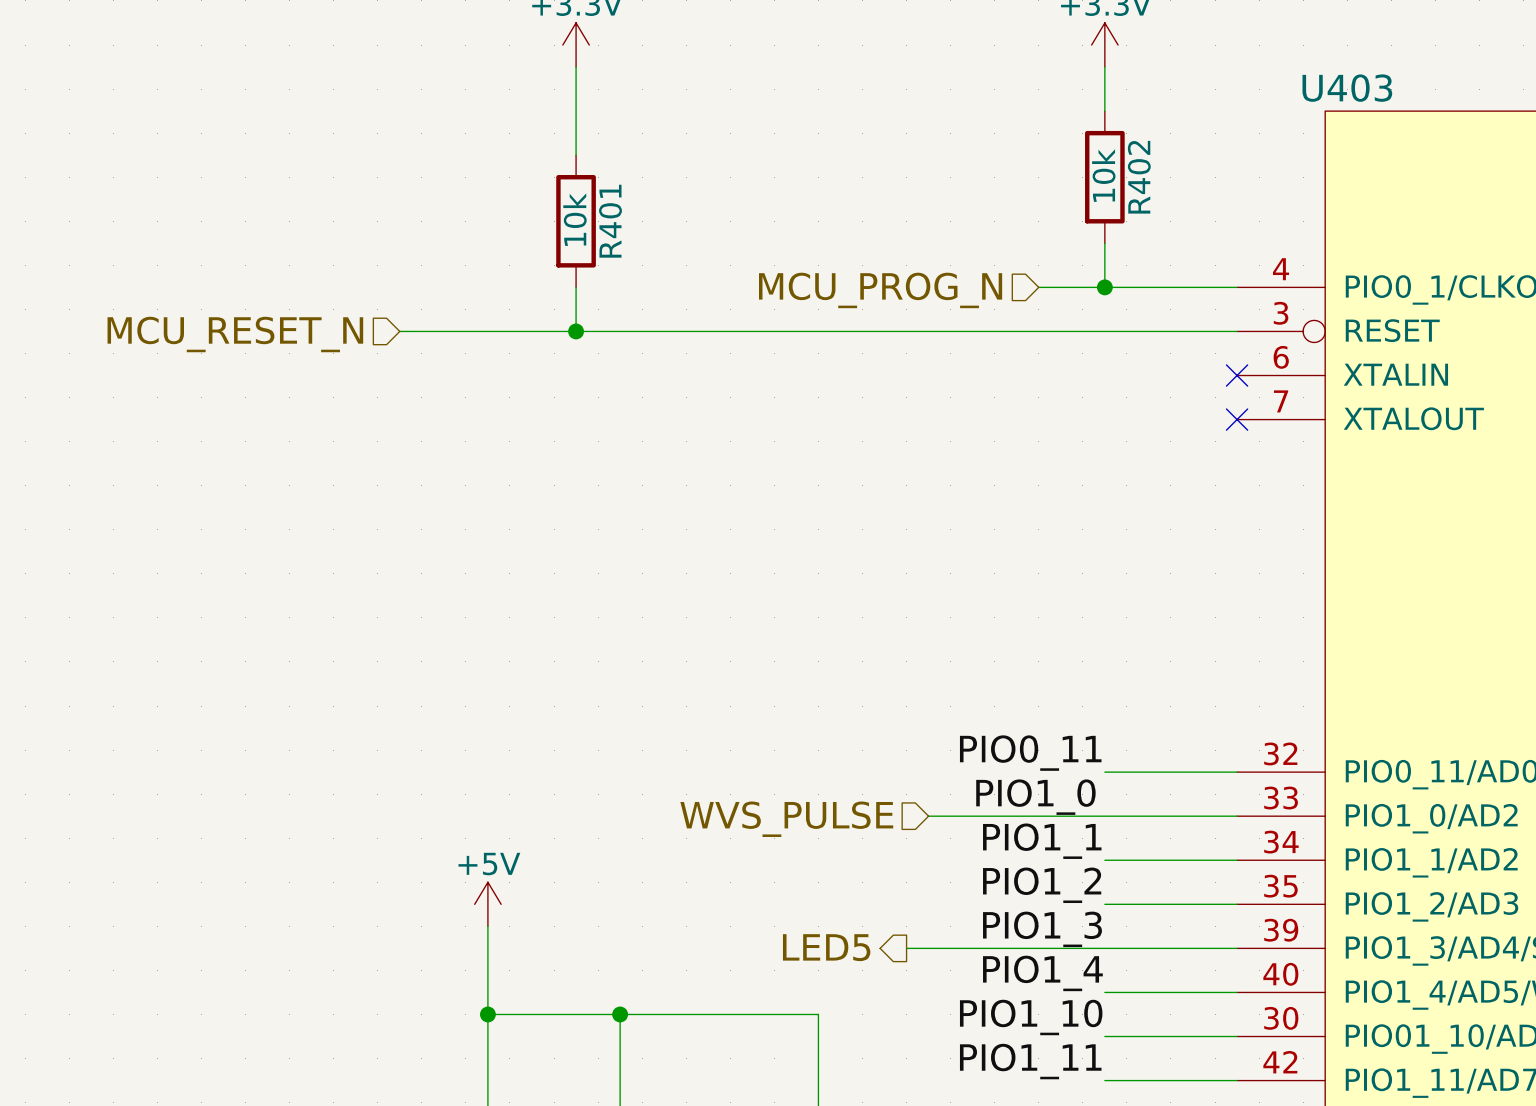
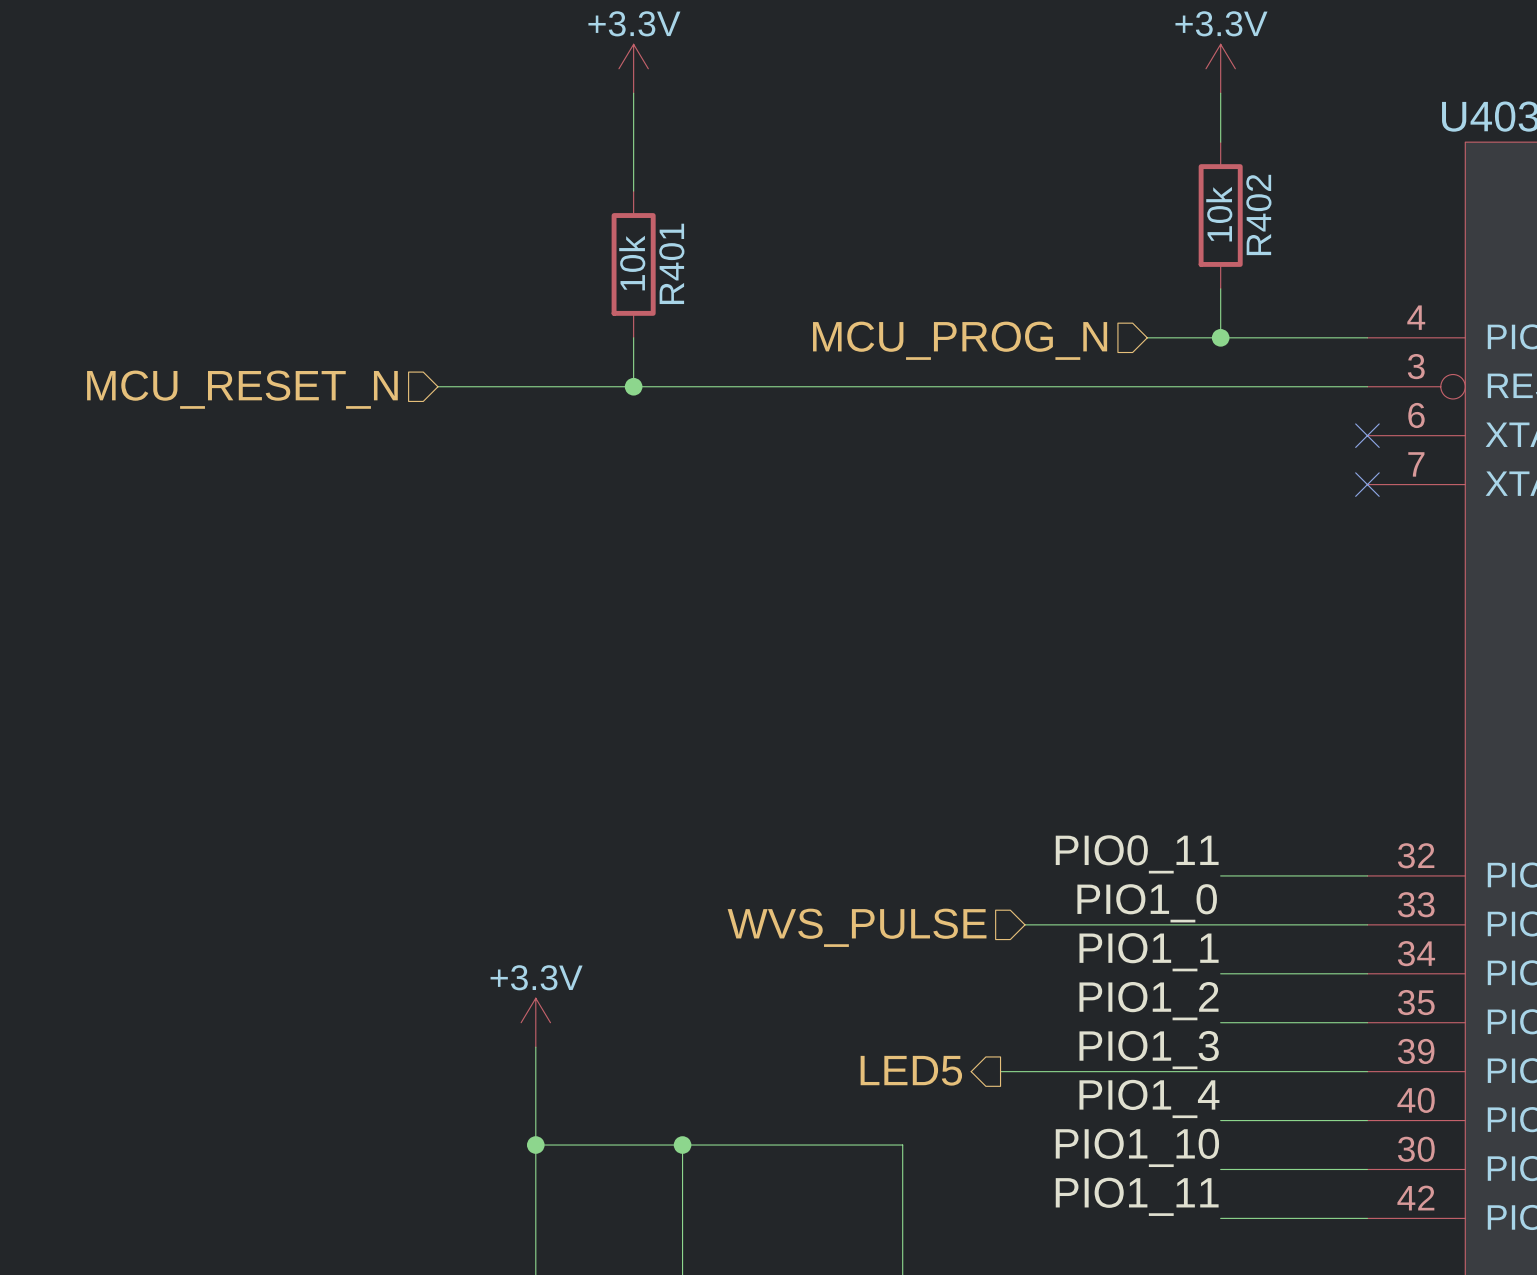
power symbol: +5V (487, 904) -> +3.3V (535, 1022)

